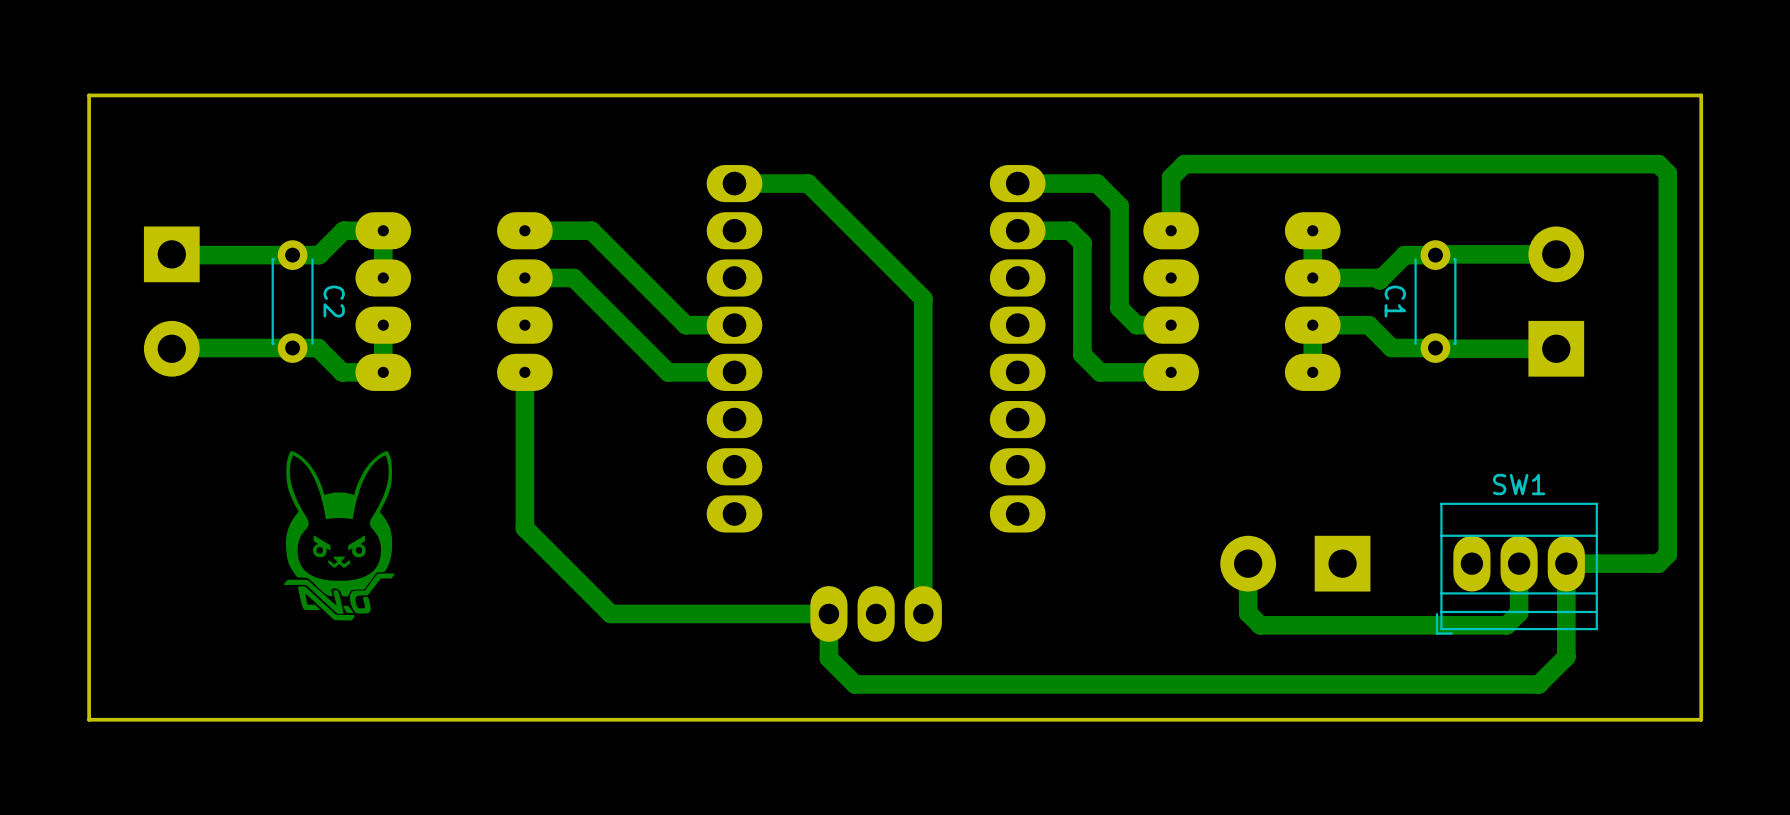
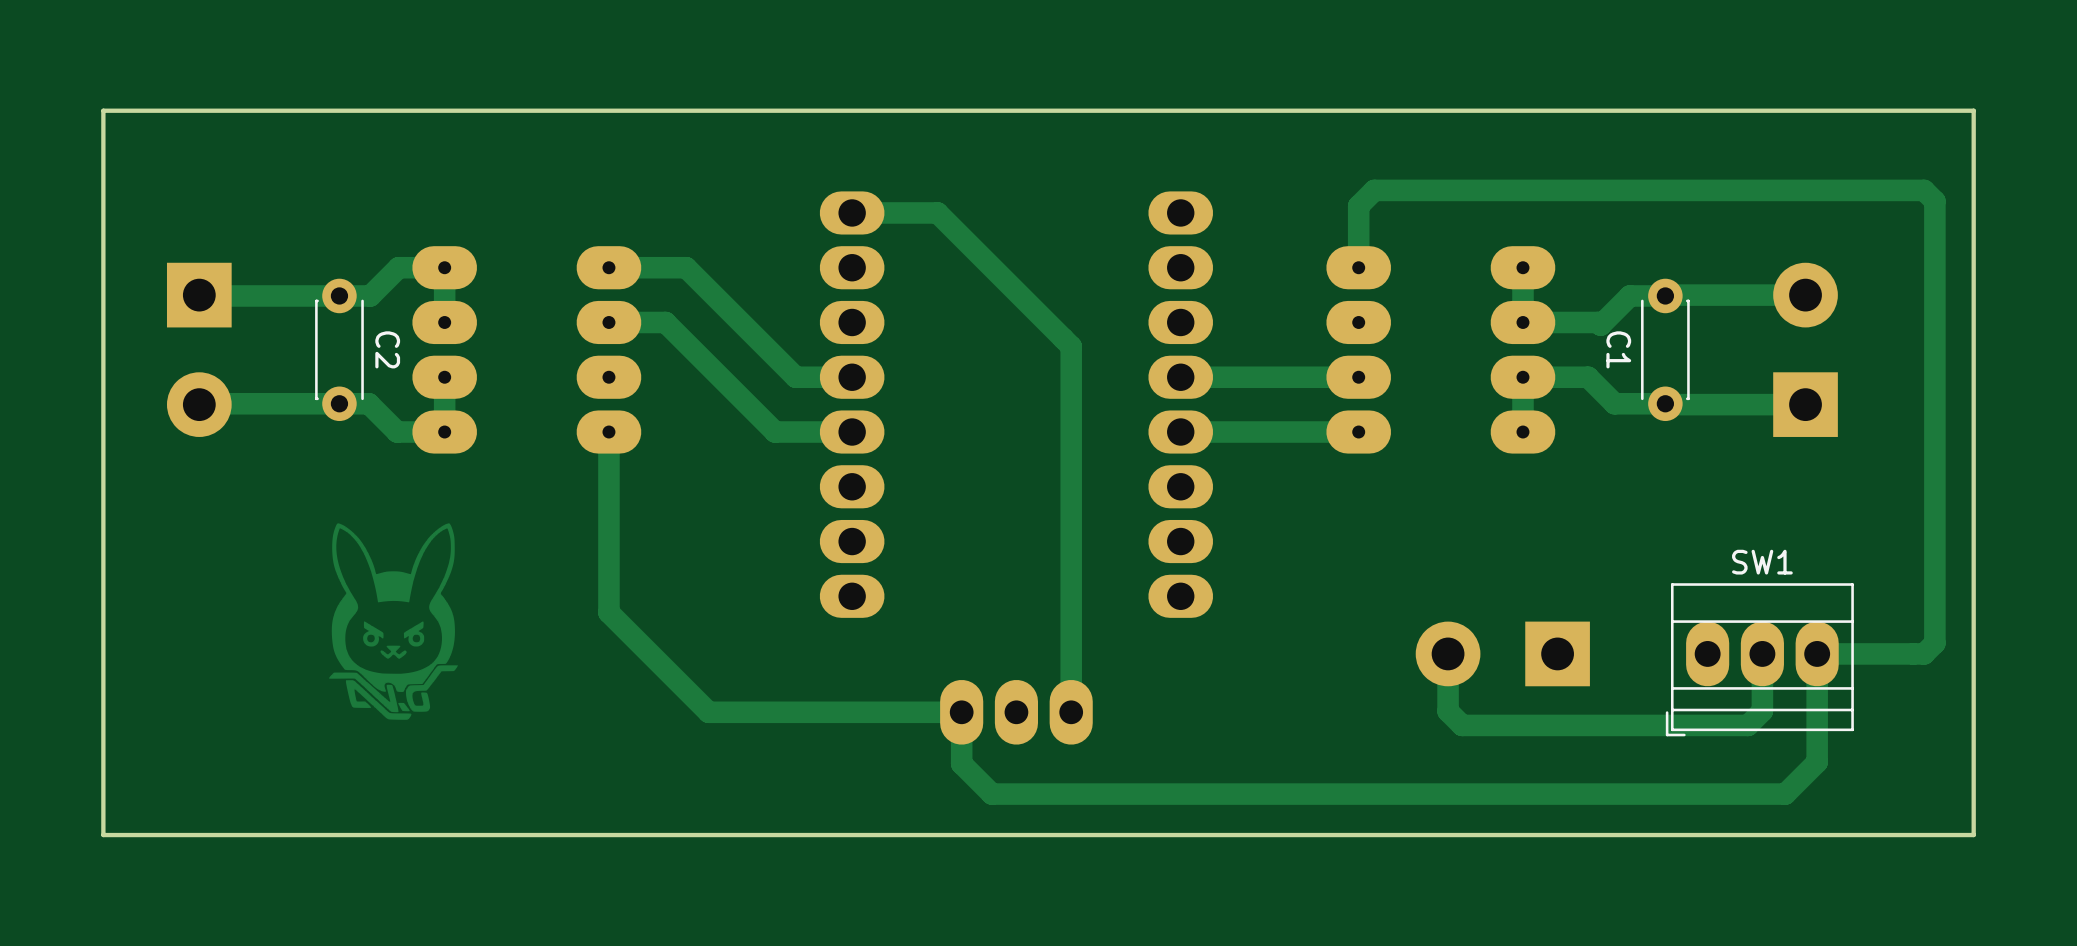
track: (1017, 183) (1097, 183) (1119, 205) (1119, 308) (1136, 325) -> (1180, 377) (1318, 377)
track: (1017, 230) (1070, 230) (1082, 243) (1082, 354) (1100, 372) -> (1180, 432) (1276, 432)

